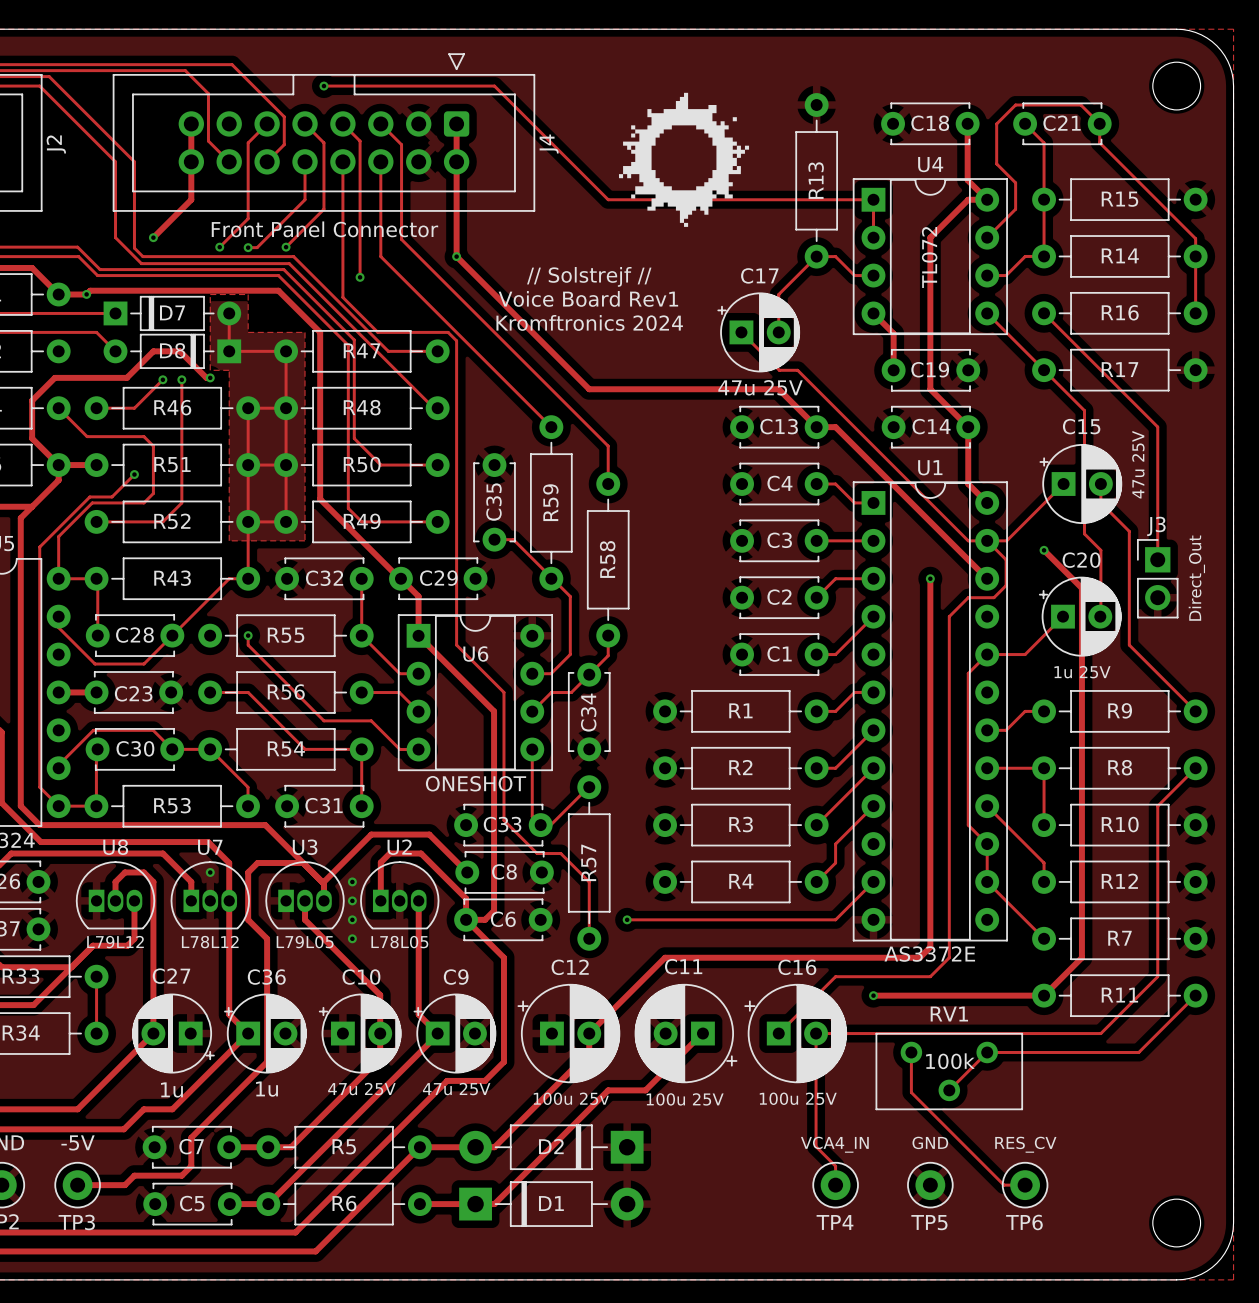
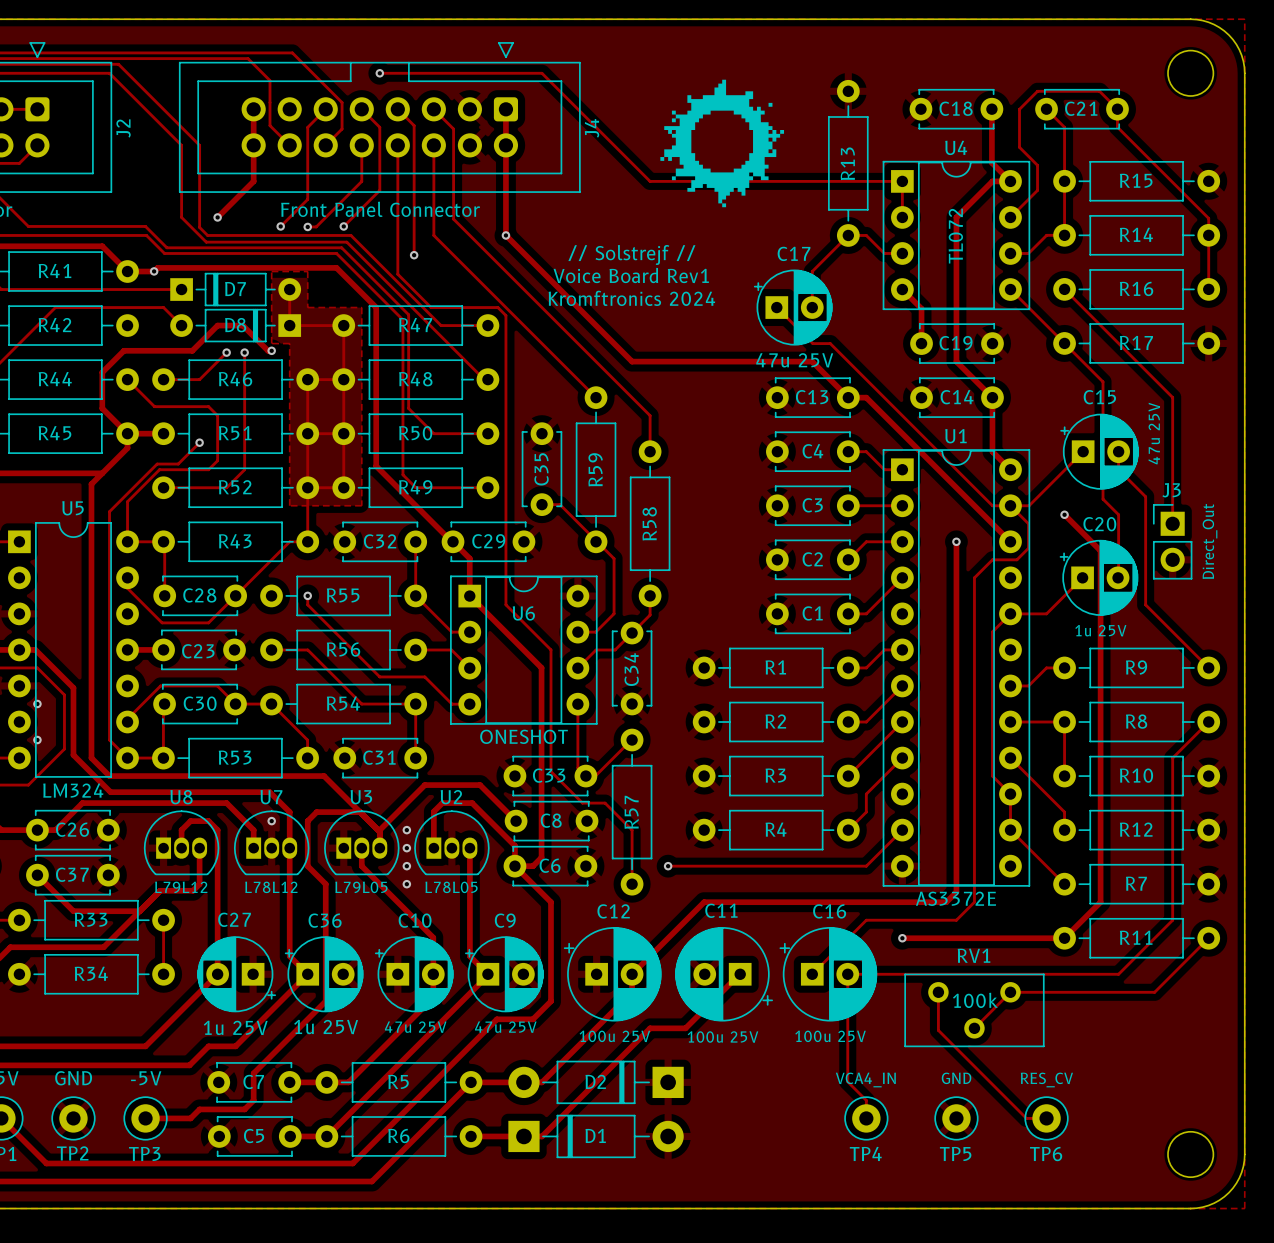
C27 value: 1u (171, 1089) -> 1u 25V (235, 1027)
C36 value: 1u (267, 1089) -> 1u 25V (326, 1027)
C12 value: 100u 25v (571, 1098) -> 100u 25V (614, 1036)

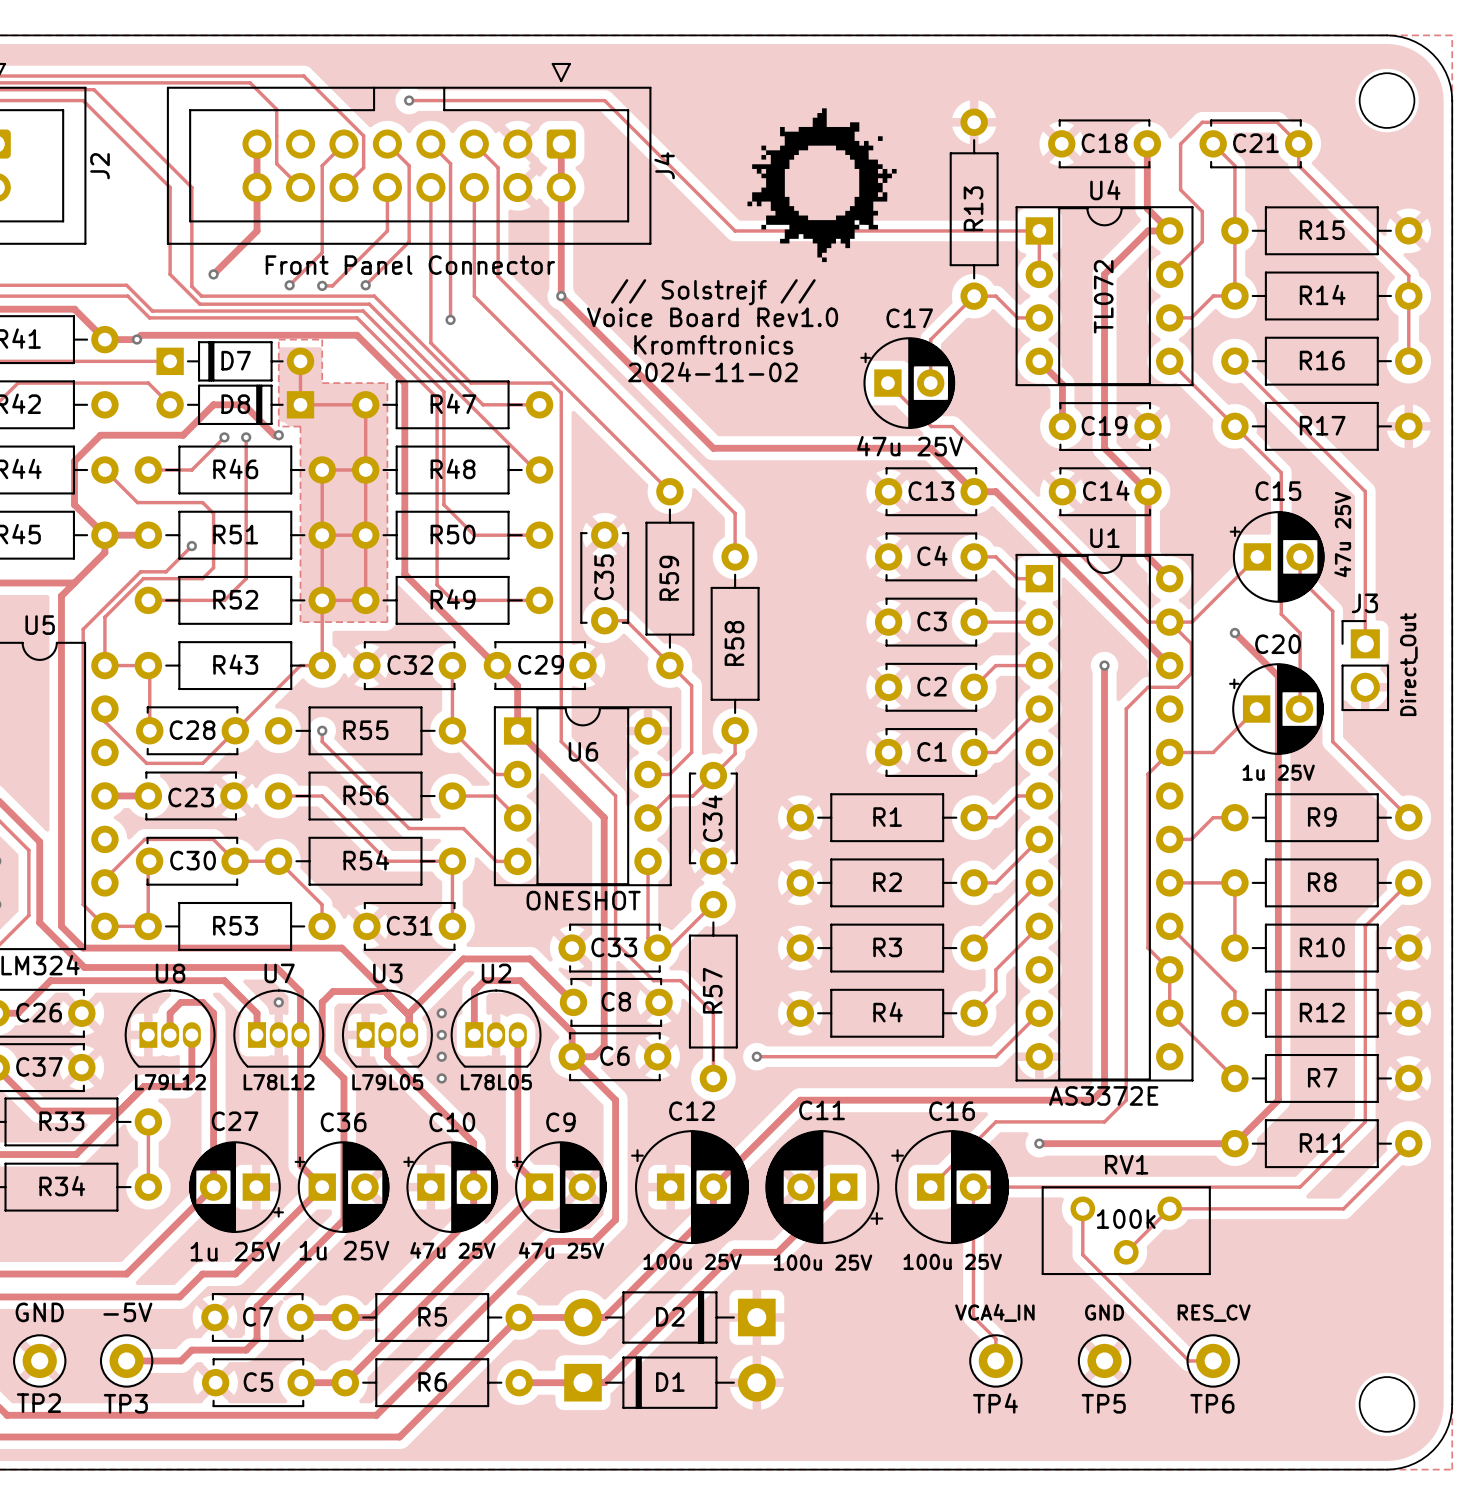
text: none -> // Solstrejf // (713, 292)
text: // Solstrejf // (631, 254) -> Voice Board Rev1.0 (712, 317)
text: Voice Board Rev1 (631, 275) -> Kromftronics (713, 344)
text: Kromftronics 2024 (631, 298) -> 2024-11-02 (712, 372)

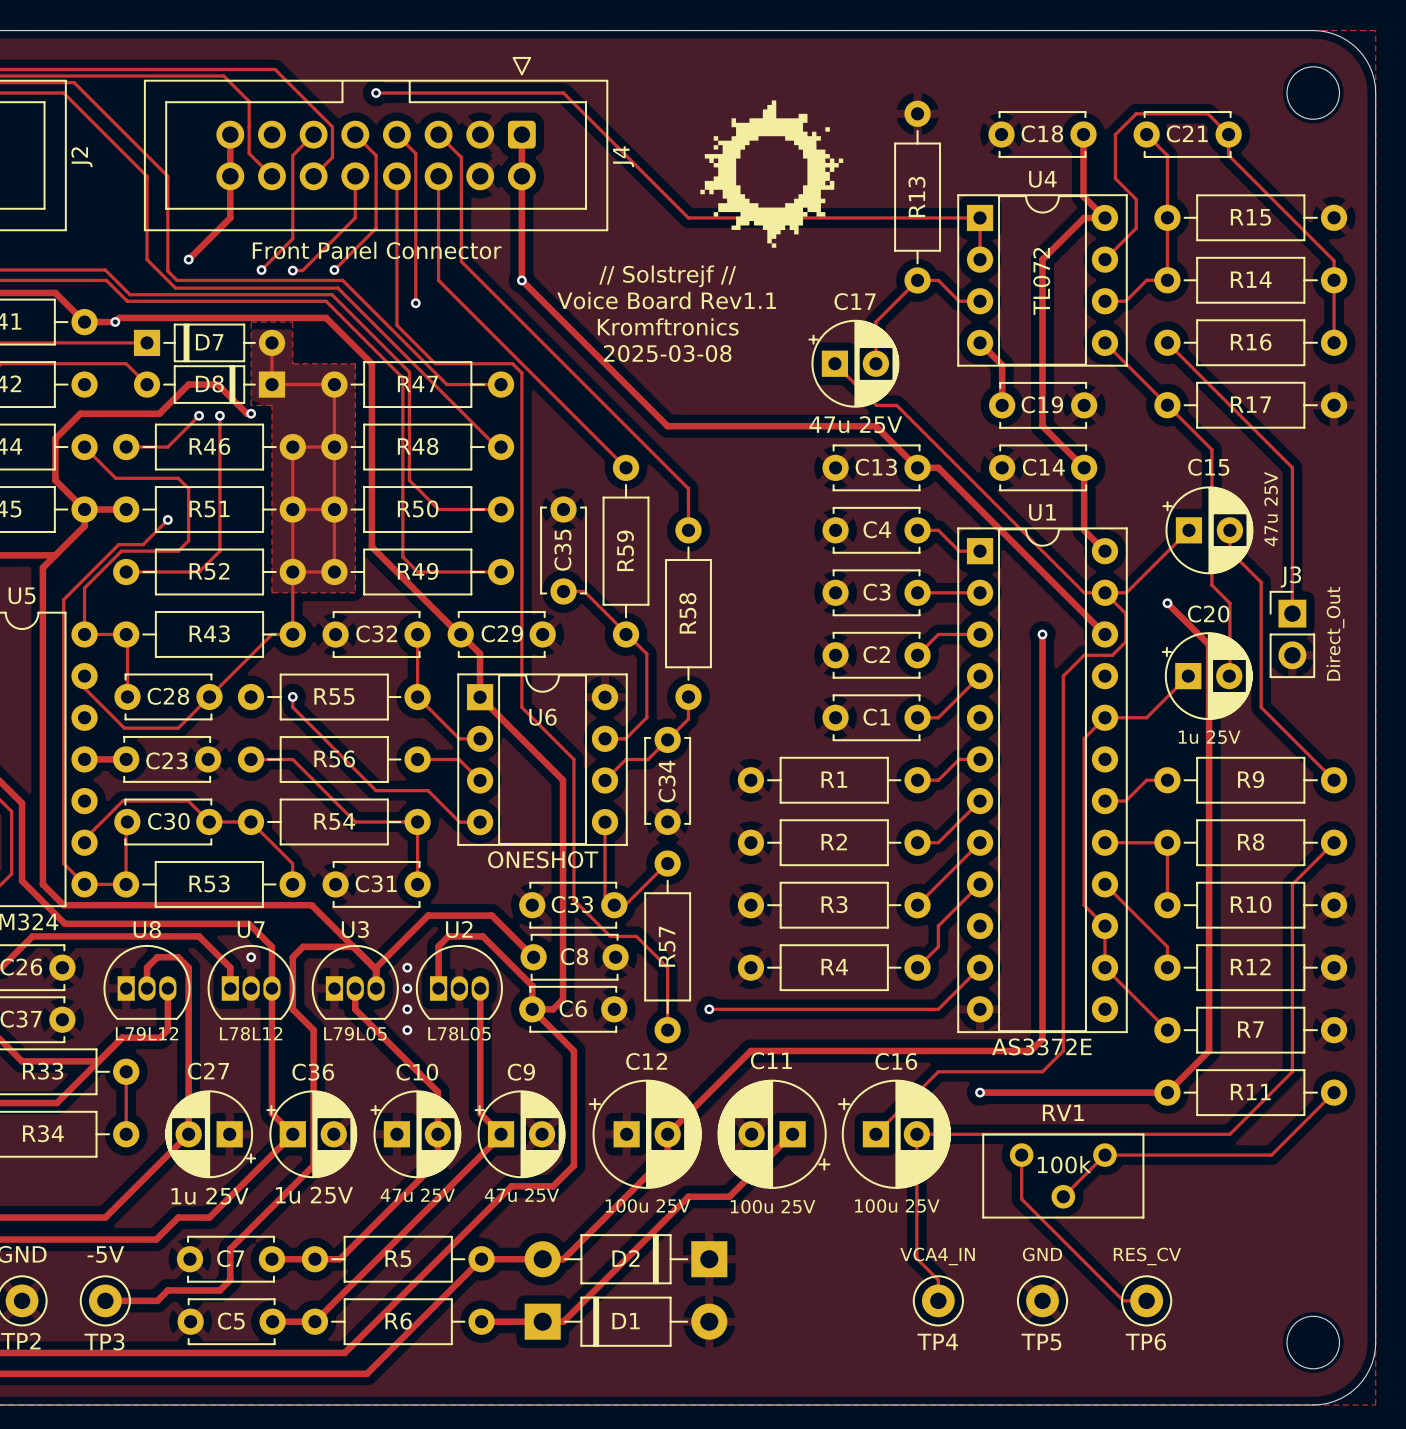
text: Voice Board Rev1.0 (712, 317) -> Voice Board Rev1.1 (666, 300)
text: 2024-11-02 (712, 372) -> 2025-03-08 (667, 353)

